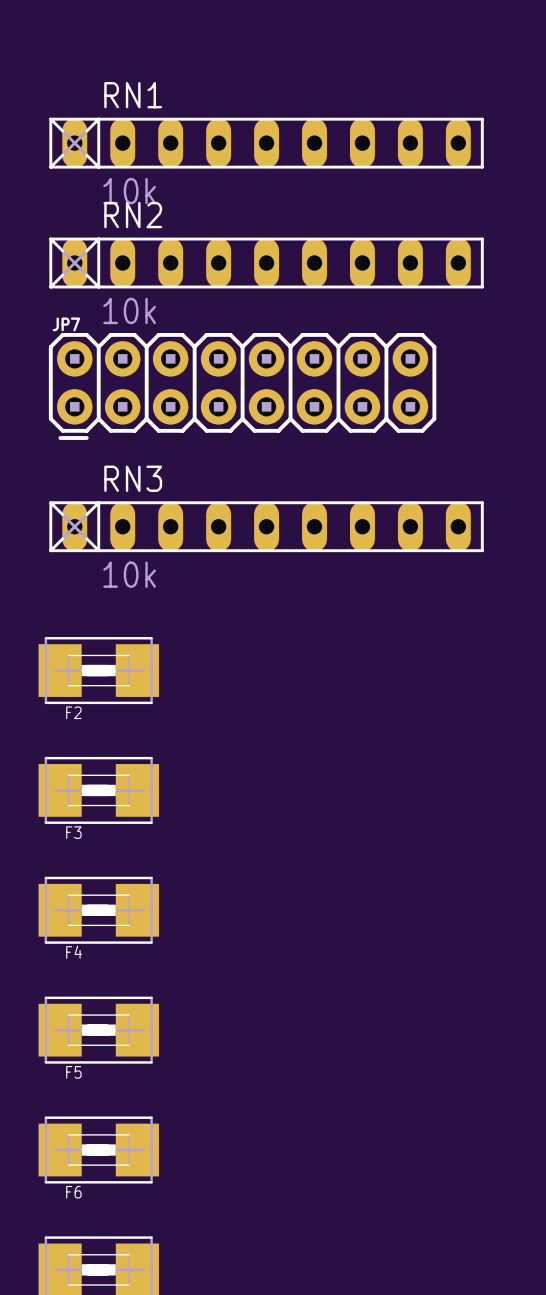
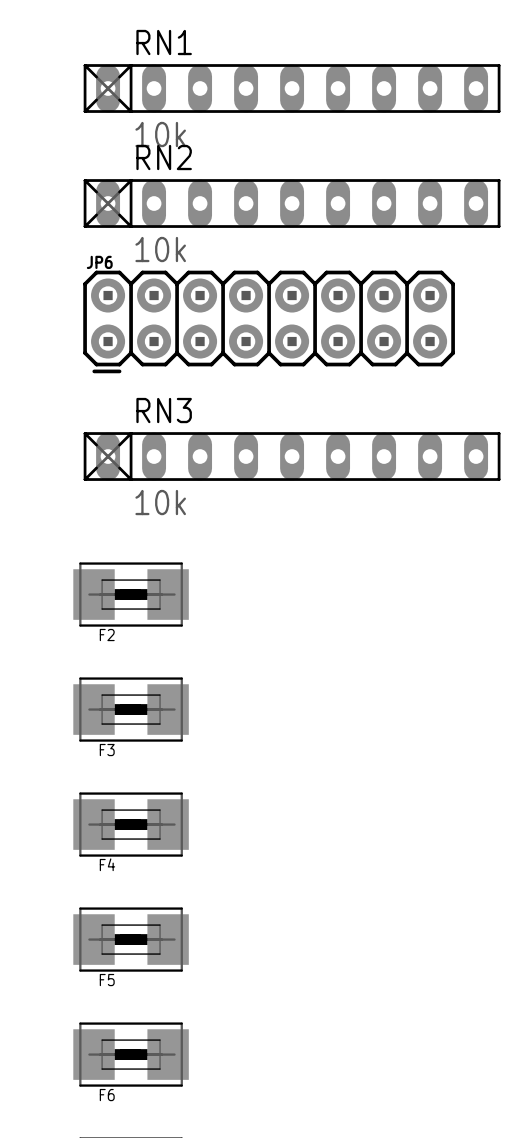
JP7 name: JP7 (66, 324) -> JP6 (99, 262)

